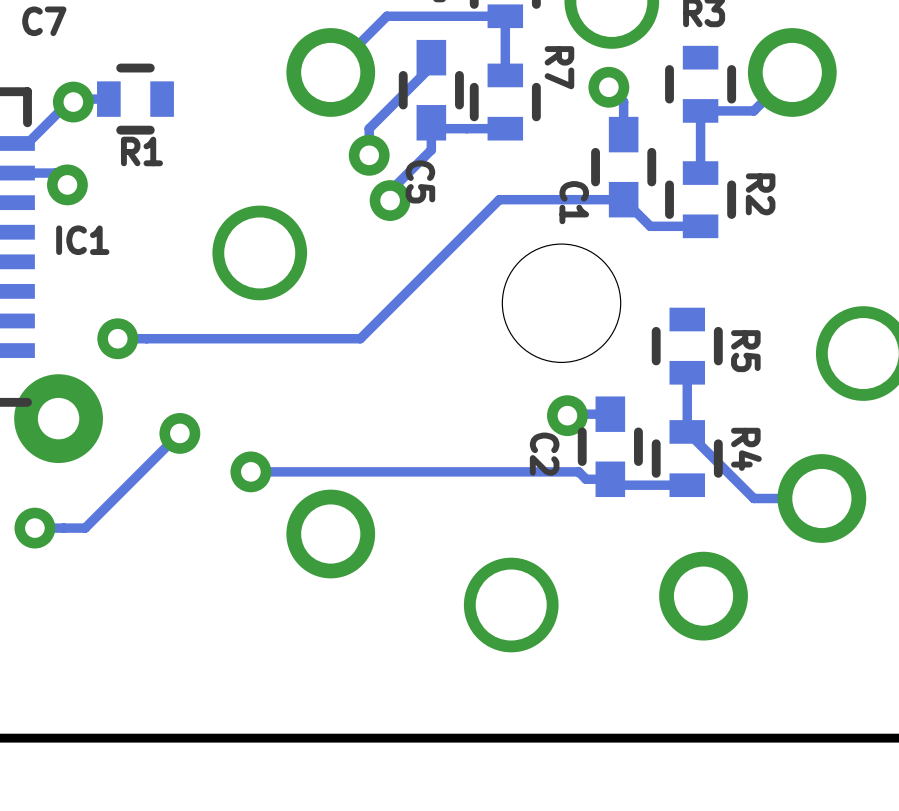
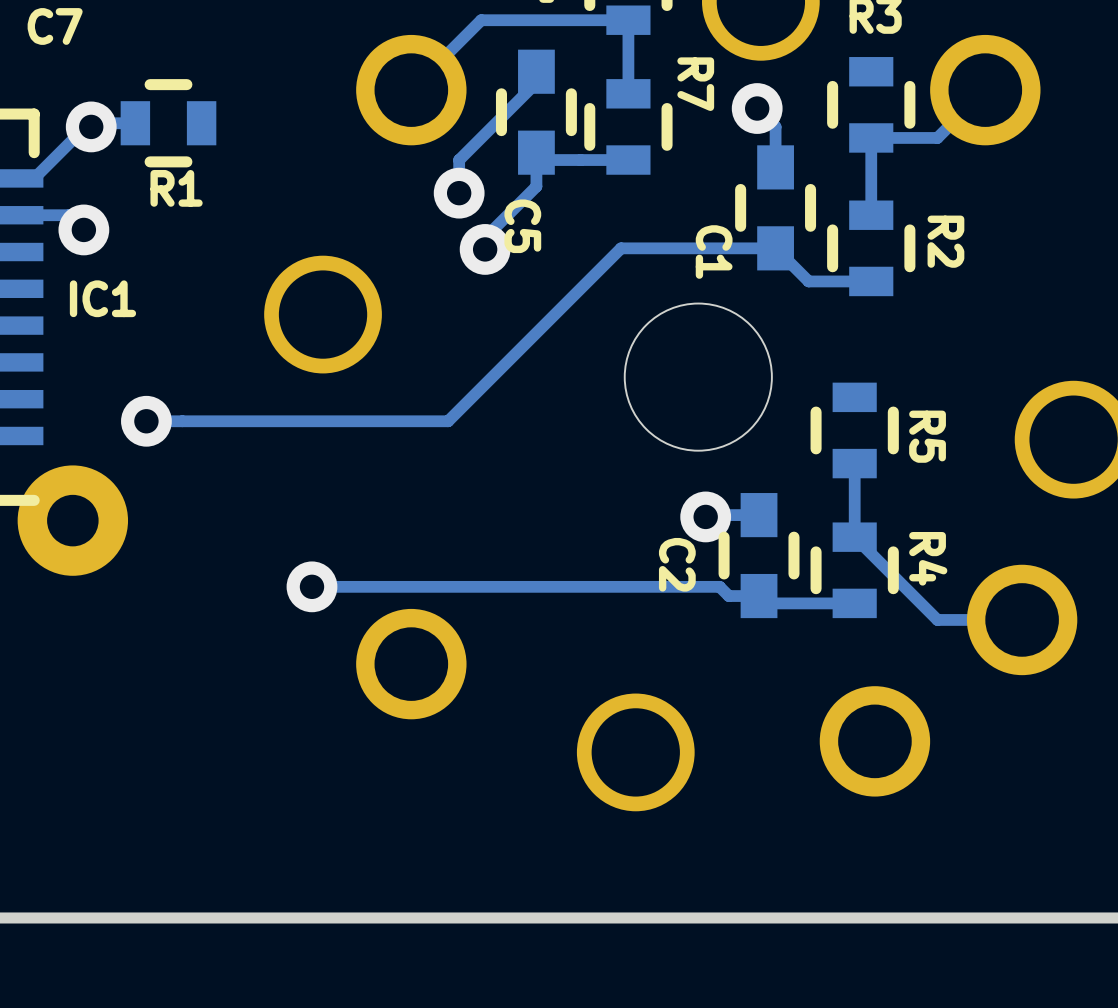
track: (179, 433) (85, 528) (34, 528) -> none
via: (179, 433) -> none
via: (34, 528) -> none

